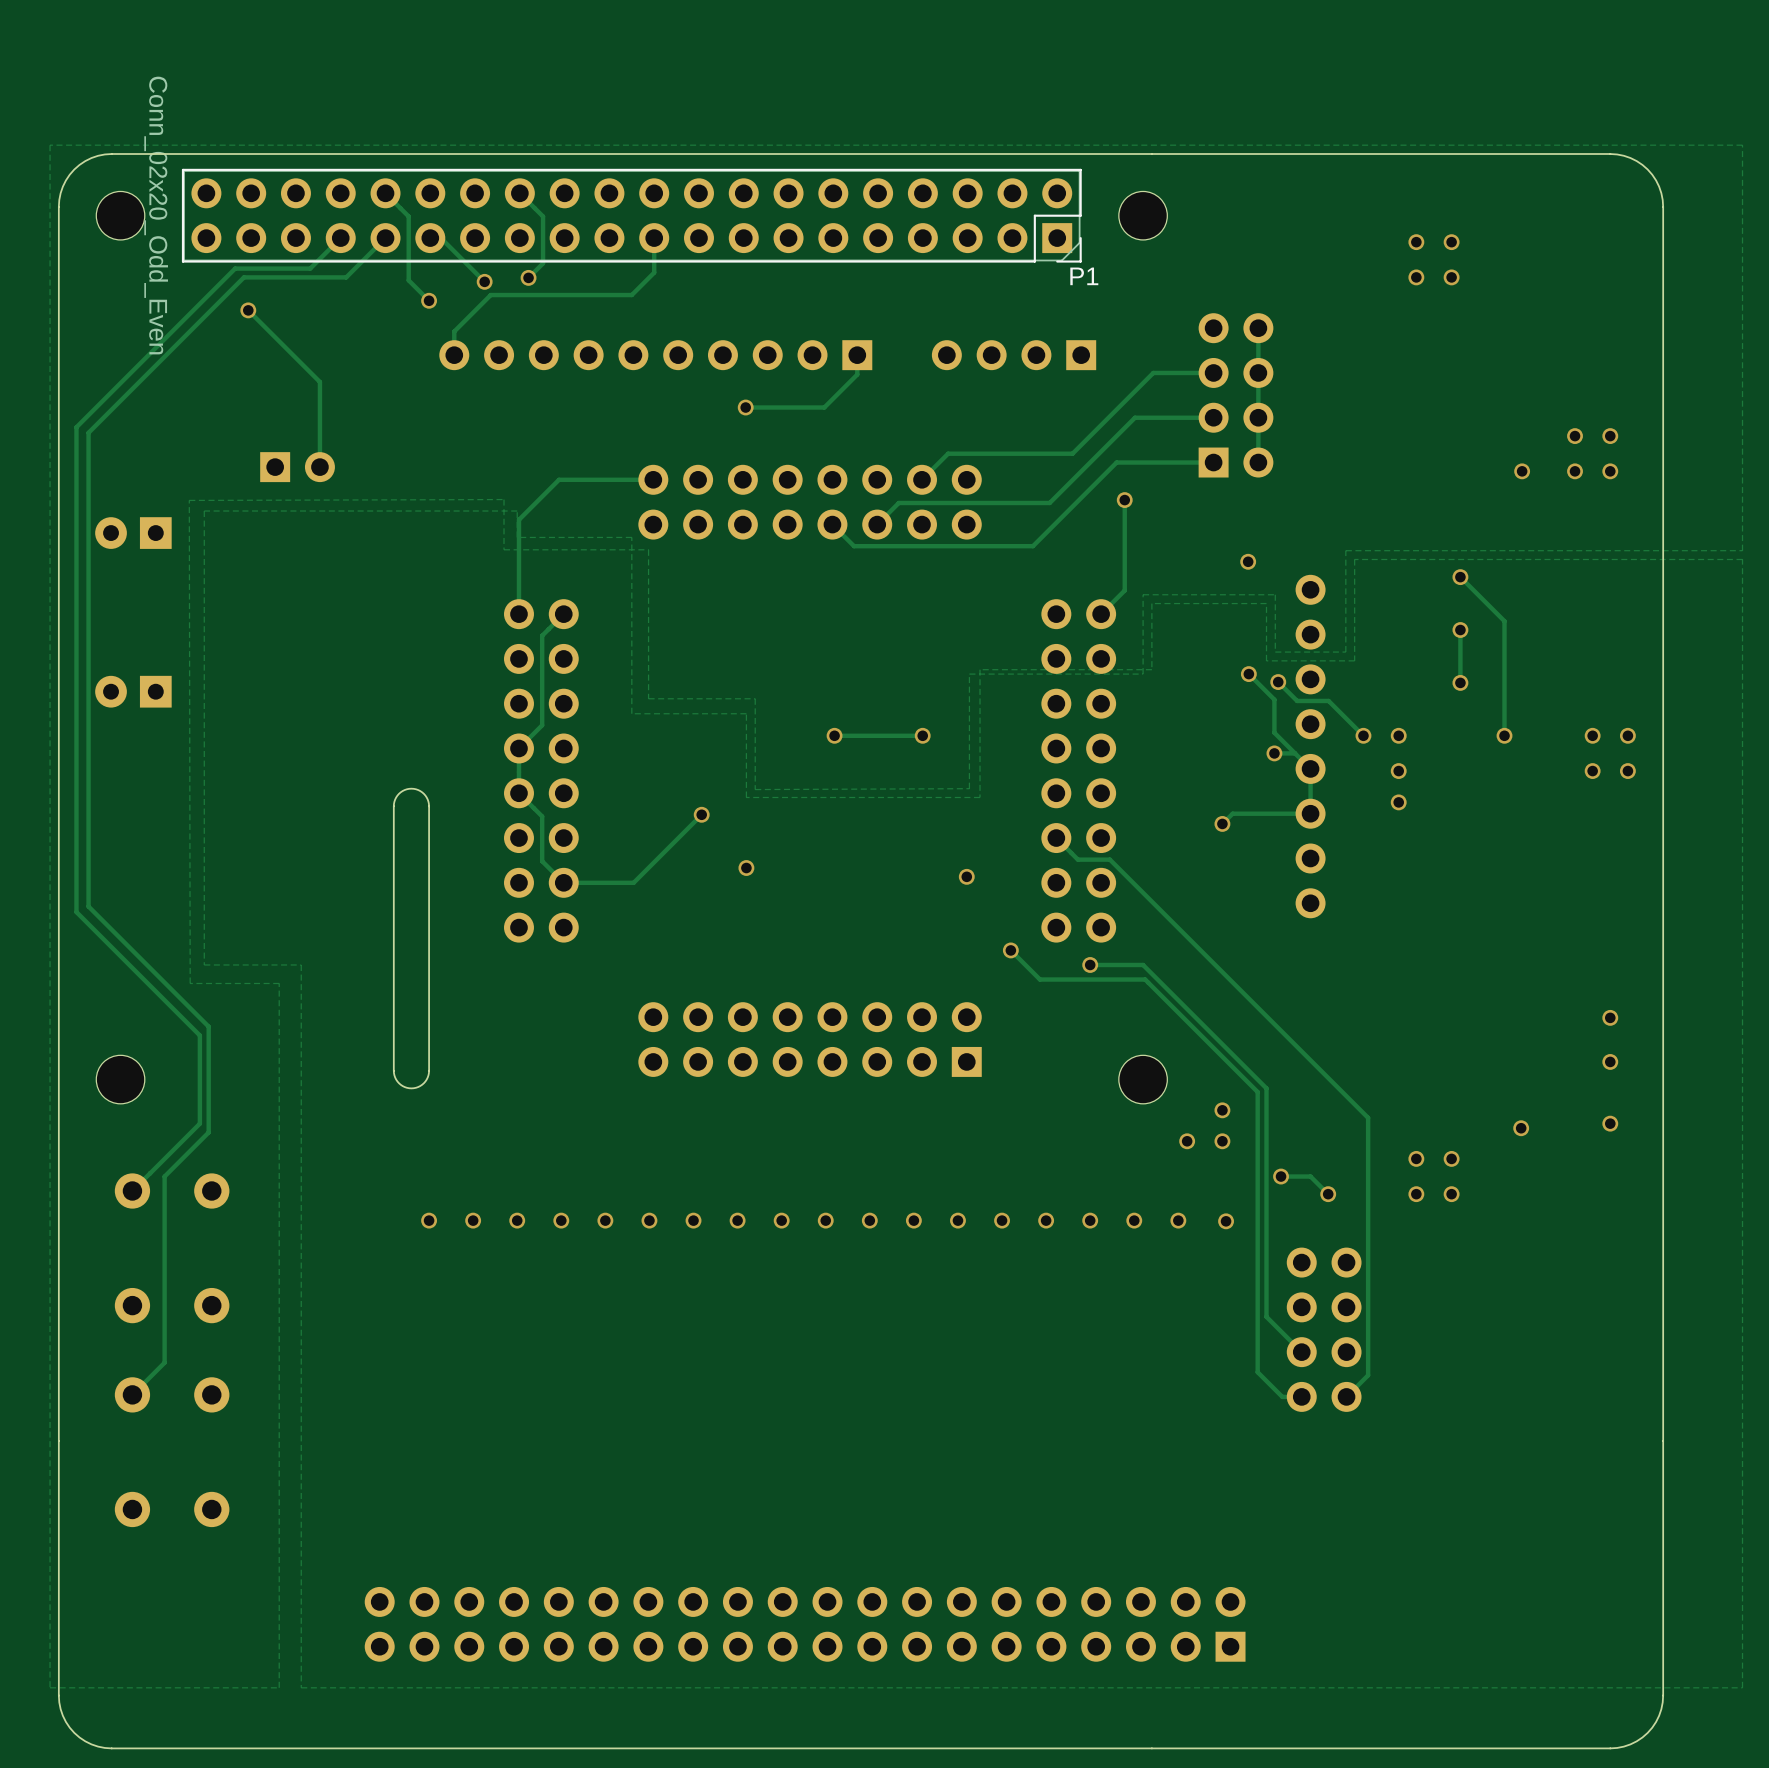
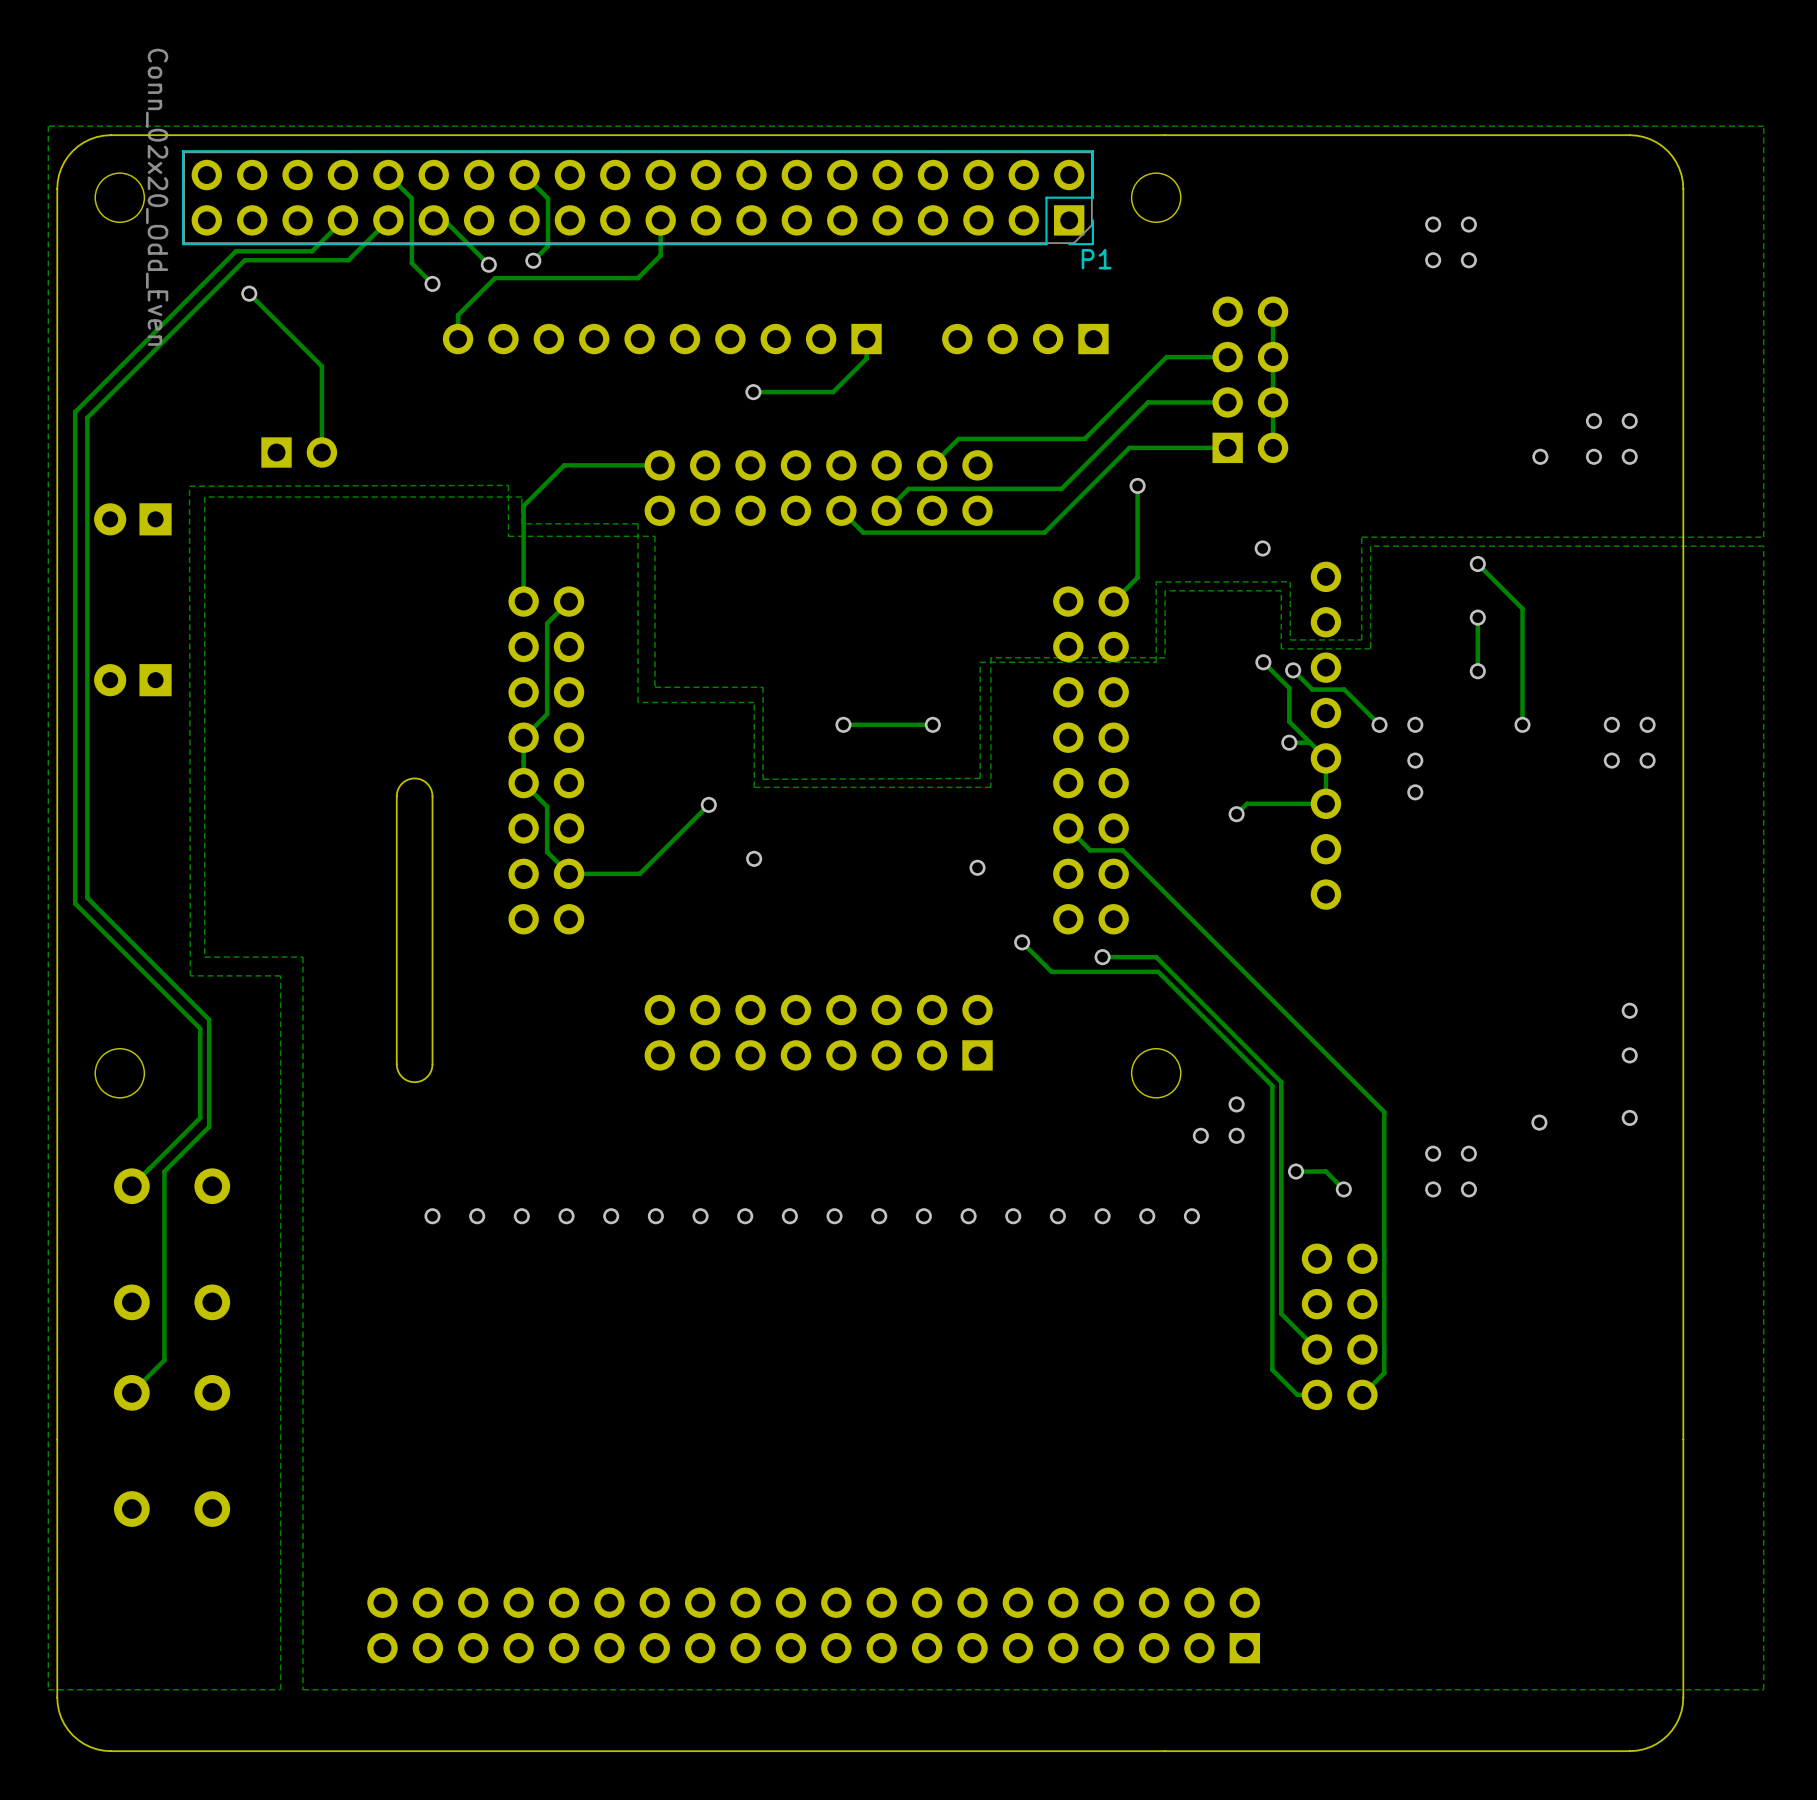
via: (1226, 1221) -> none

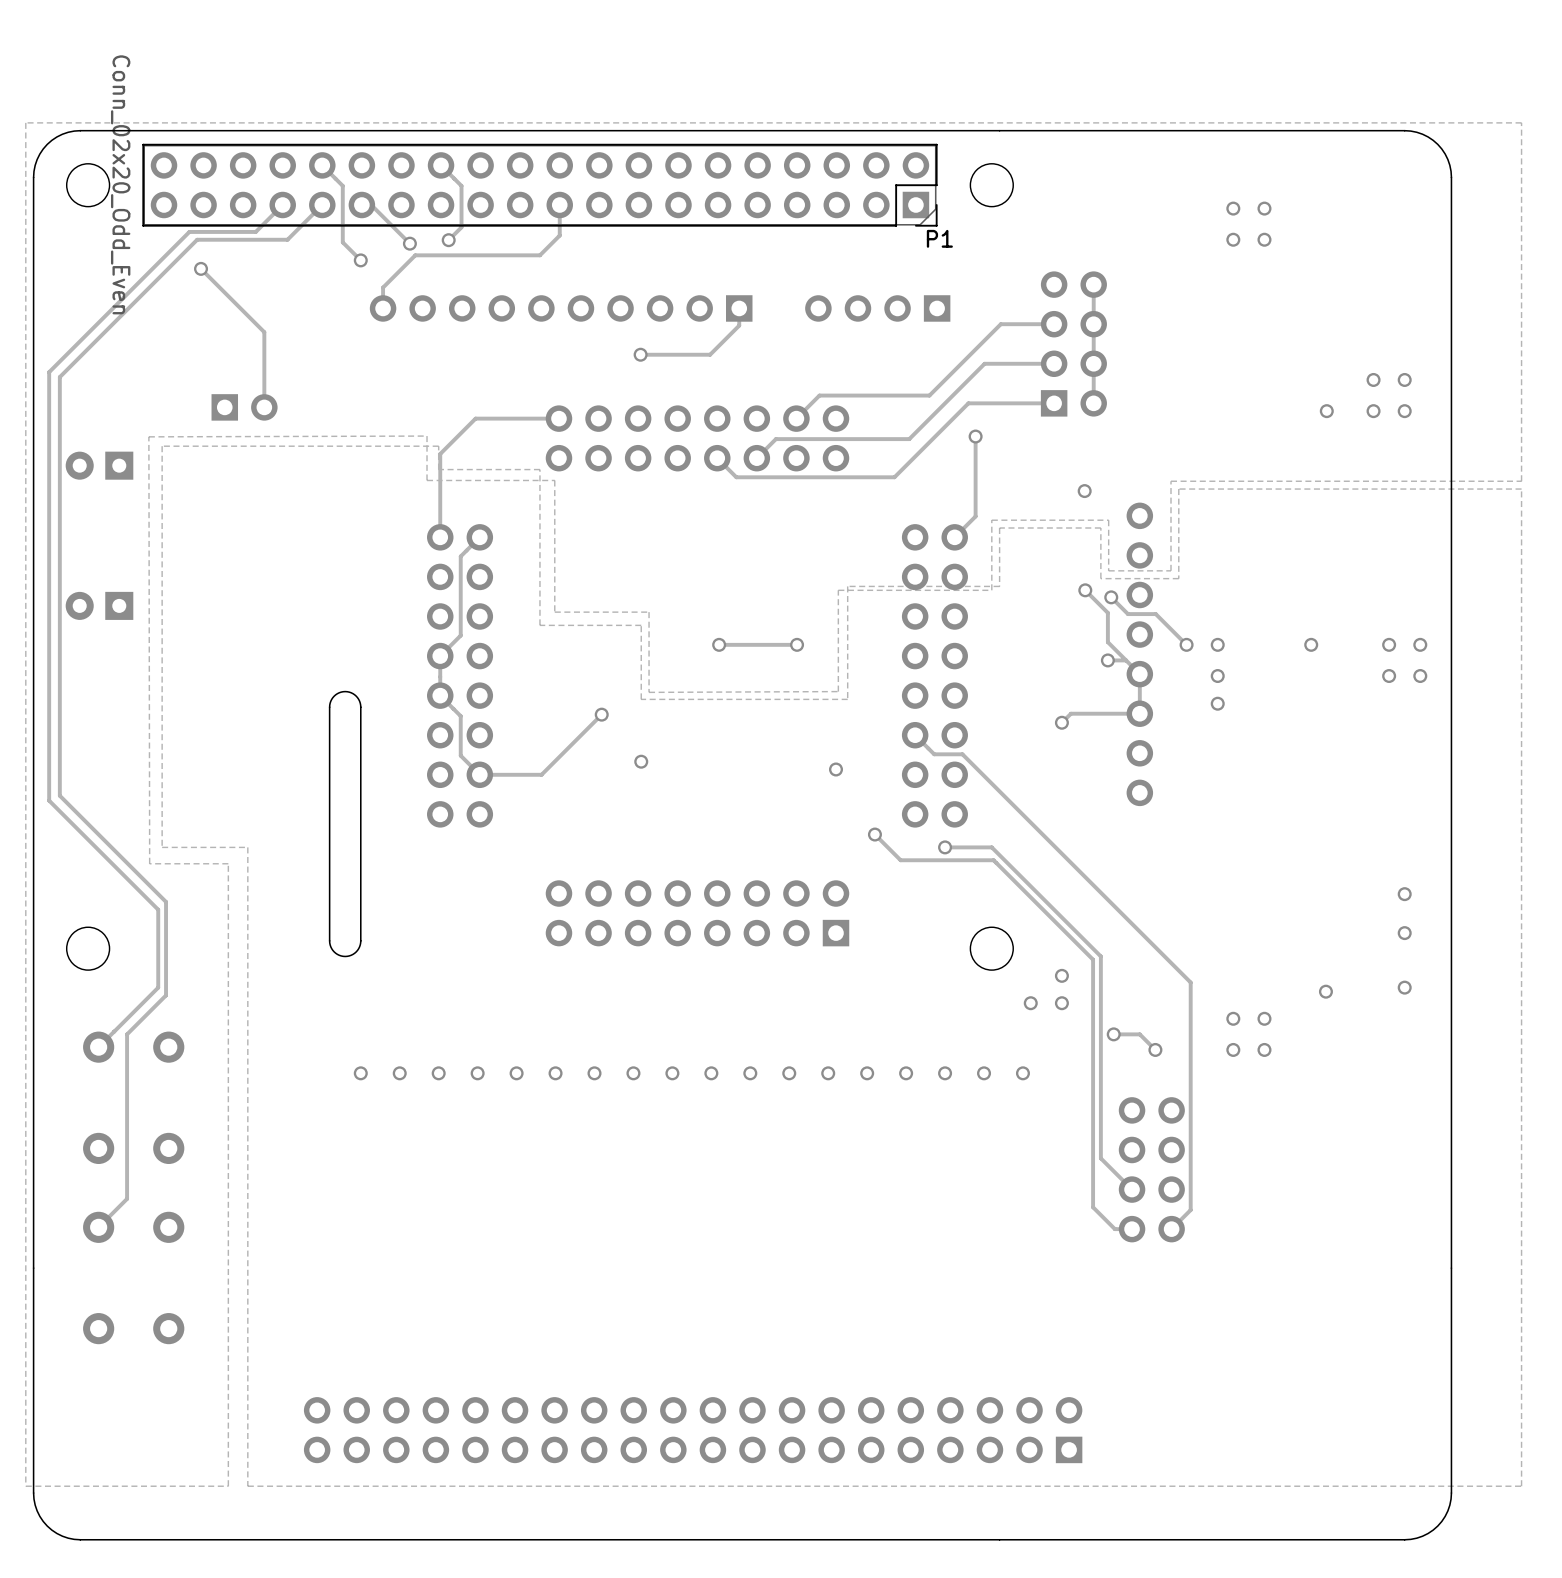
track: (1477, 564) (1522, 608) (1522, 724) -> none
via: (1477, 564) -> none
track: (1477, 617) (1477, 671) -> none
via: (1477, 617) -> none
via: (1477, 671) -> none

